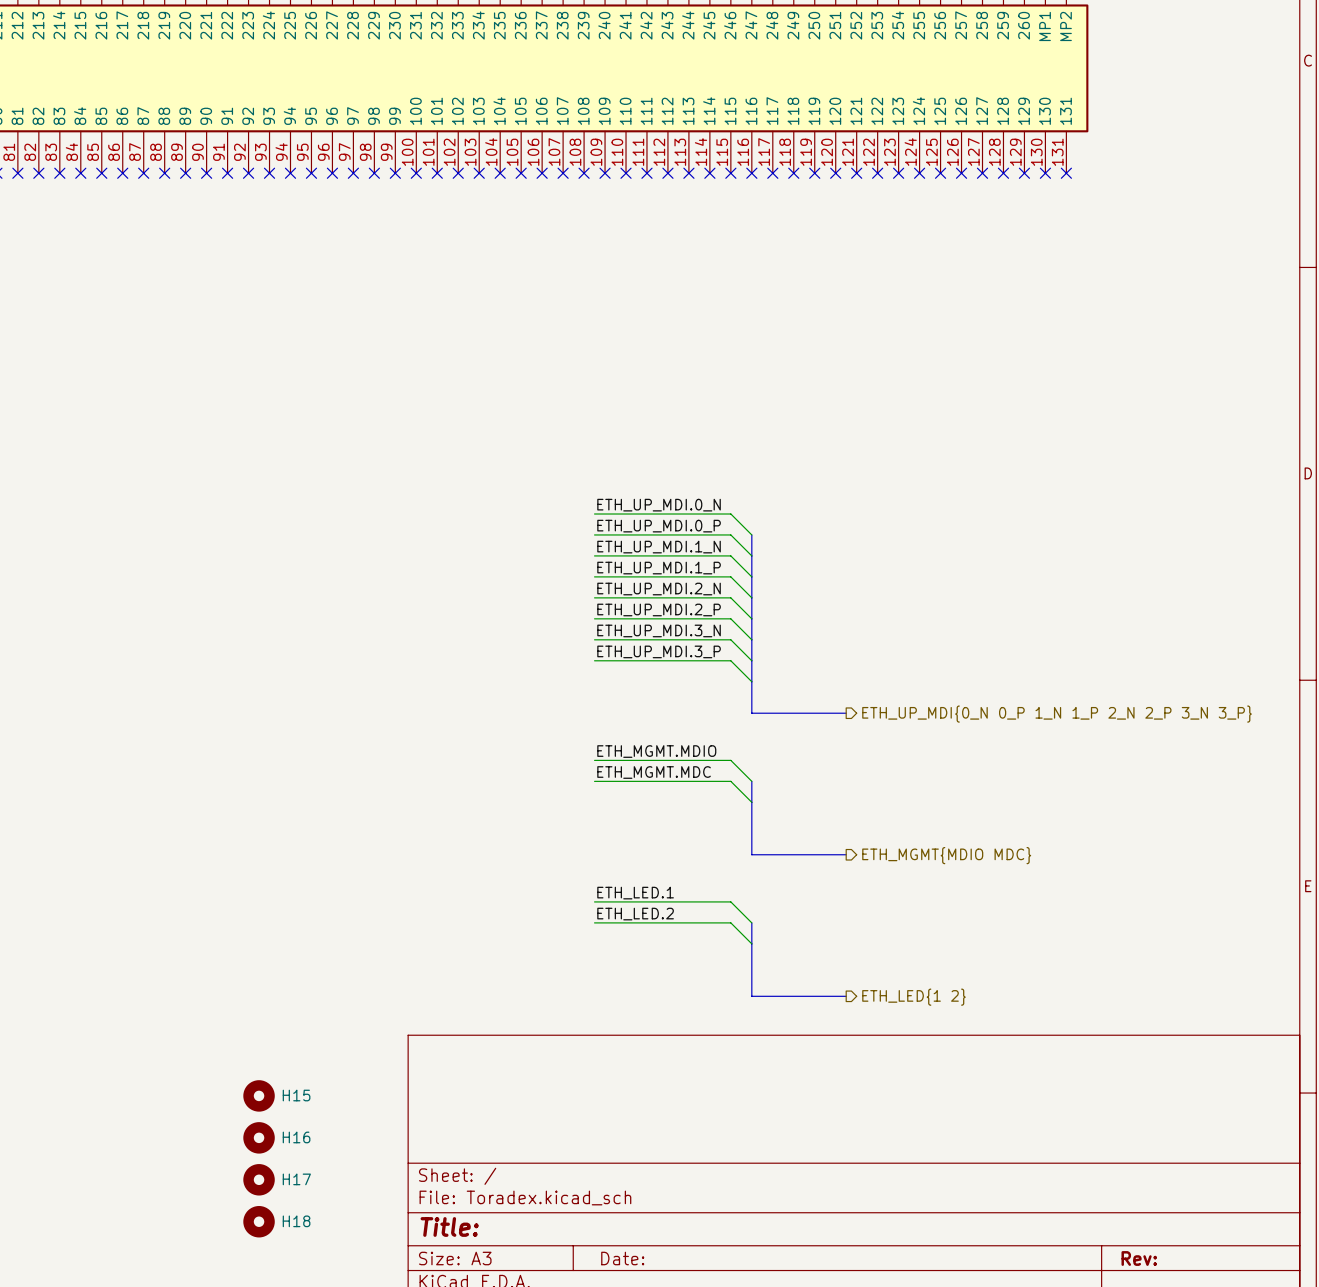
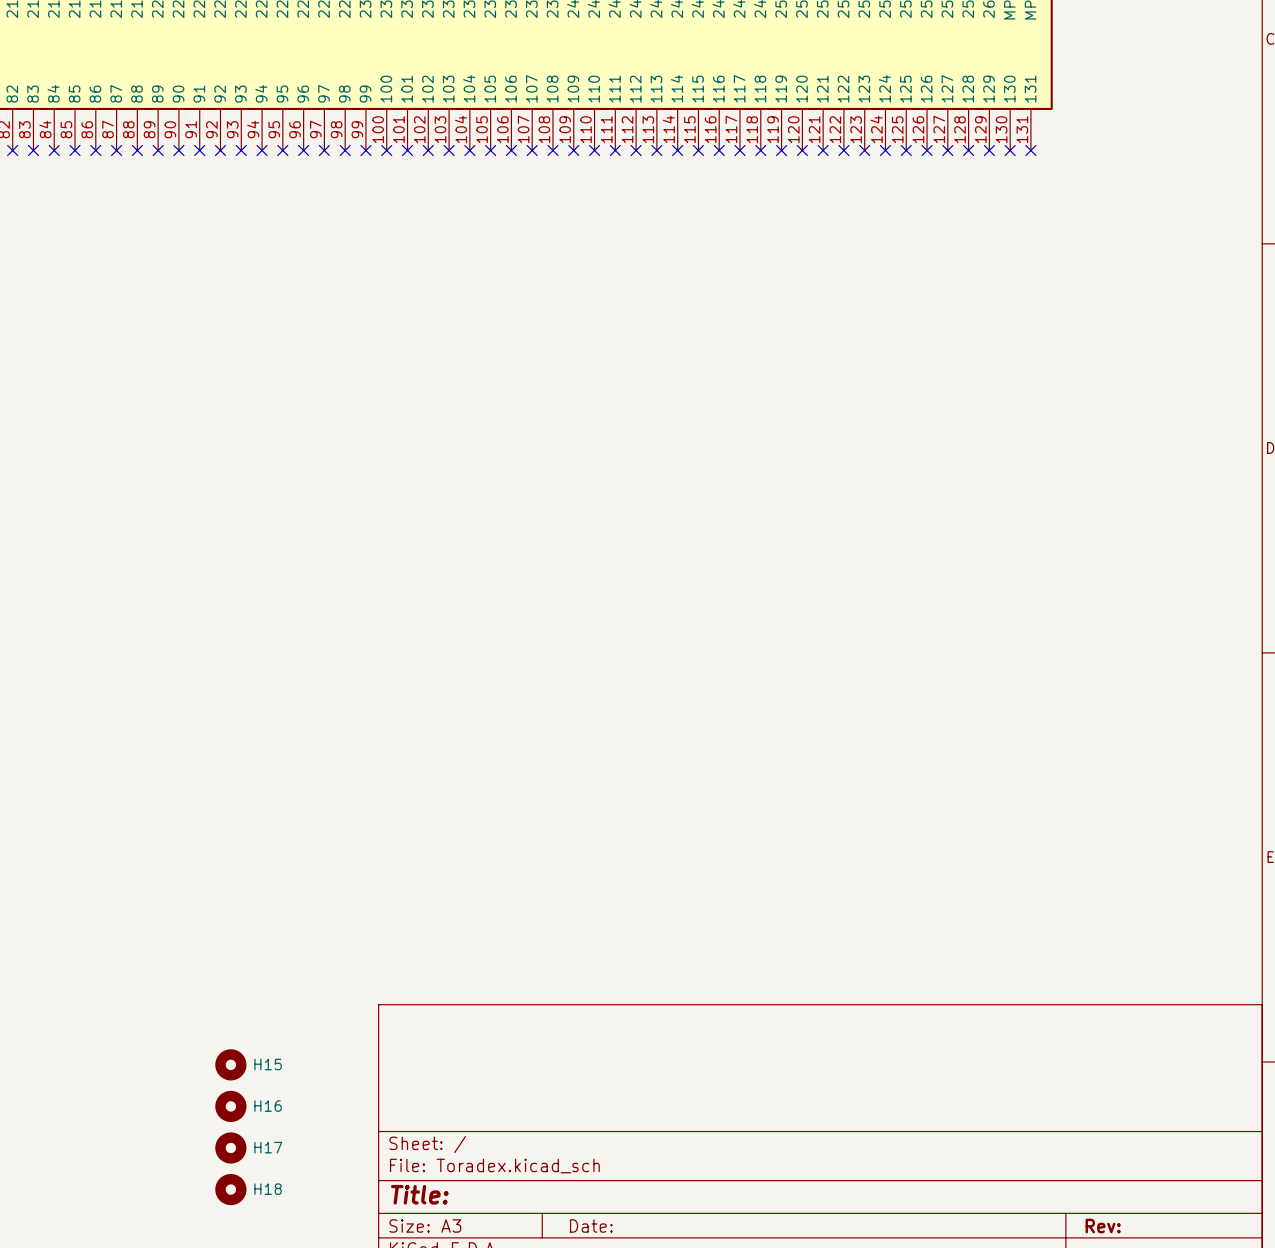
label: ETH_UP_MDI.0_N (659, 505) -> none
wire: (594, 514) (730, 514) (751, 534) -> none
label: ETH_UP_MDI.0_P (659, 526) -> none
wire: (594, 534) (730, 534) (751, 555) -> none
bus: (751, 534) (751, 713) (846, 713) -> none
label: ETH_UP_MDI.1_N (659, 547) -> none
wire: (594, 555) (730, 555) -> none
wire: (730, 555) (751, 576) -> none
label: ETH_UP_MDI.1_P (659, 568) -> none
wire: (594, 576) (730, 576) (751, 597) -> none
label: ETH_UP_MDI.2_N (659, 589) -> none
wire: (594, 597) (730, 597) (751, 618) -> none
label: ETH_UP_MDI.2_P (659, 609) -> none
wire: (594, 618) (730, 618) (751, 639) -> none
label: ETH_UP_MDI.3_N (659, 630) -> none
wire: (594, 639) (730, 639) -> none
wire: (730, 639) (751, 660) -> none
label: ETH_UP_MDI.3_P (659, 651) -> none
wire: (594, 660) (730, 660) (751, 681) -> none
hierarchical label: ETH_UP_MDI{0_N 0_P 1_N 1_P 2_N 2_P 3_N 3_P} (1057, 714) -> none
label: ETH_MGMT.MDIO (656, 751) -> none
wire: (594, 760) (730, 760) (751, 781) -> none
label: ETH_MGMT.MDC (654, 772) -> none
wire: (594, 781) (730, 781) (751, 802) -> none
bus: (751, 781) (751, 854) (846, 854) -> none
hierarchical label: ETH_MGMT{MDIO MDC} (946, 855) -> none
label: ETH_LED.1 (635, 893) -> none
wire: (594, 901) (730, 901) -> none
wire: (730, 901) (751, 922) -> none
label: ETH_LED.2 (635, 914) -> none
wire: (594, 922) (730, 922) (751, 943) -> none
bus: (751, 922) (751, 996) (846, 996) -> none
hierarchical label: ETH_LED{1 2} (914, 997) -> none

